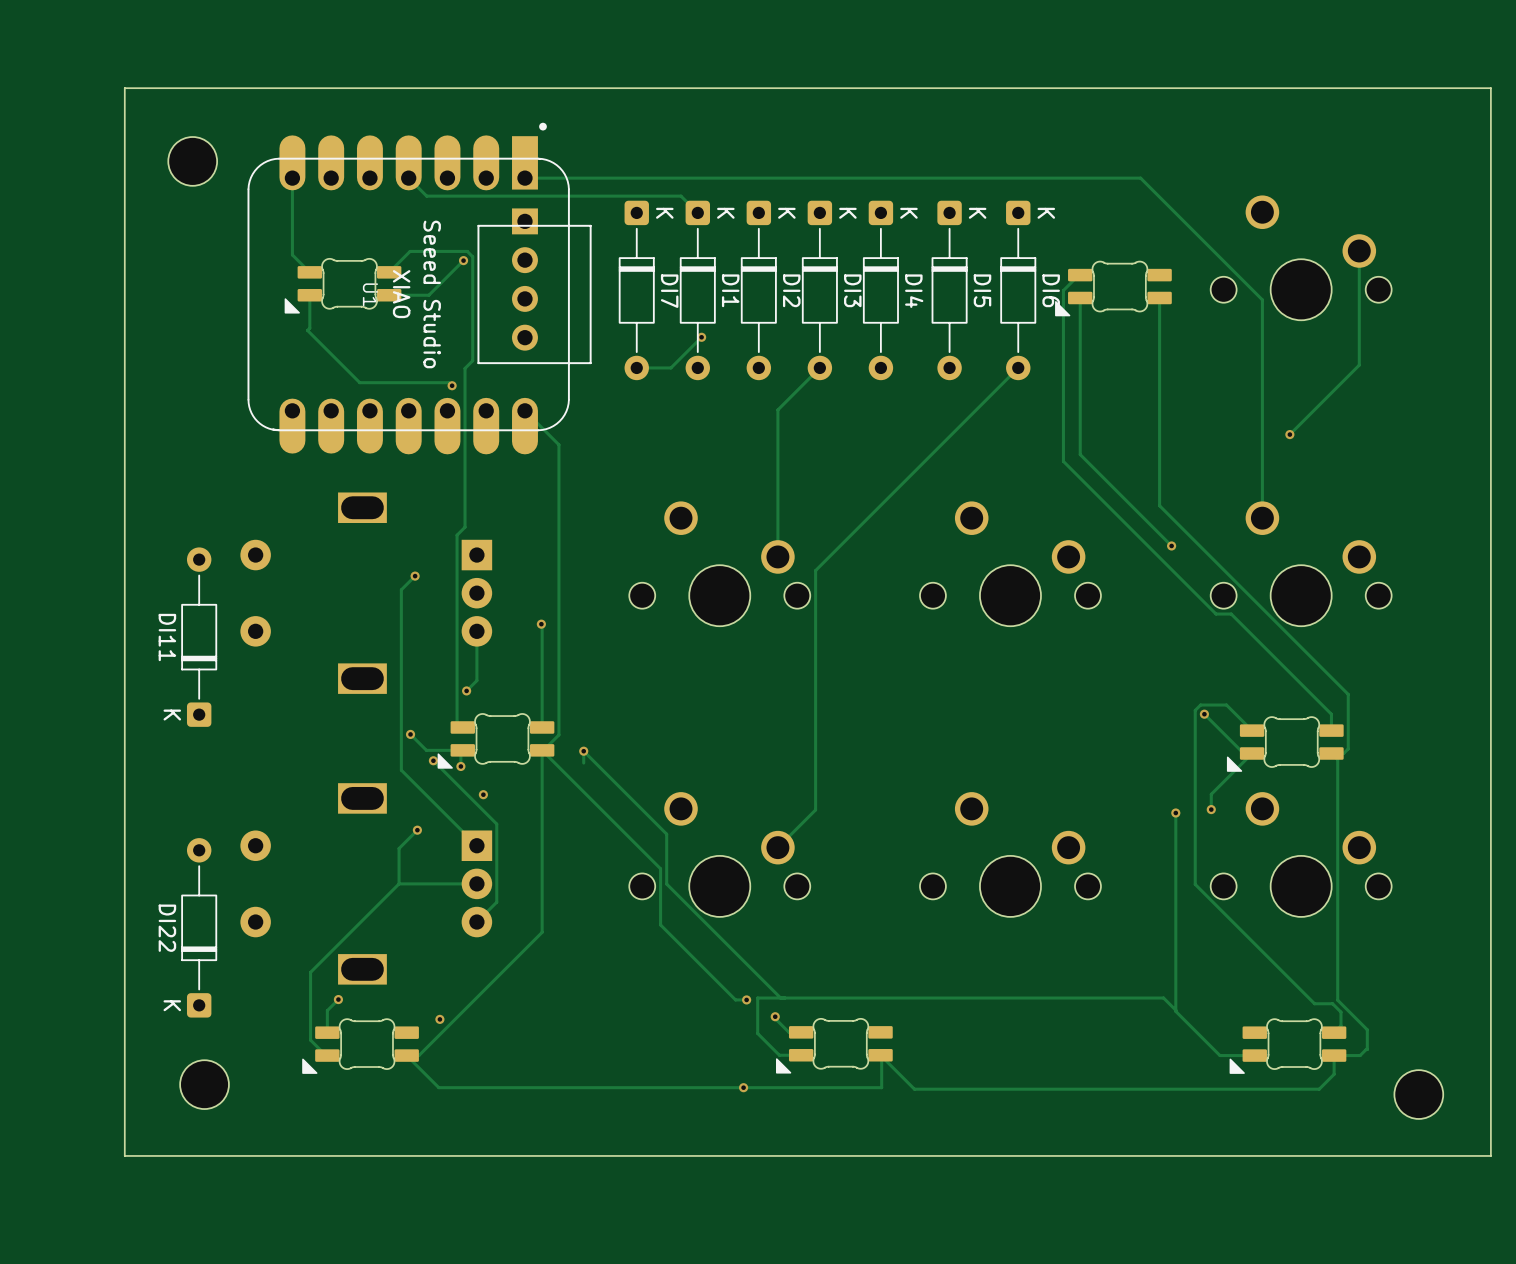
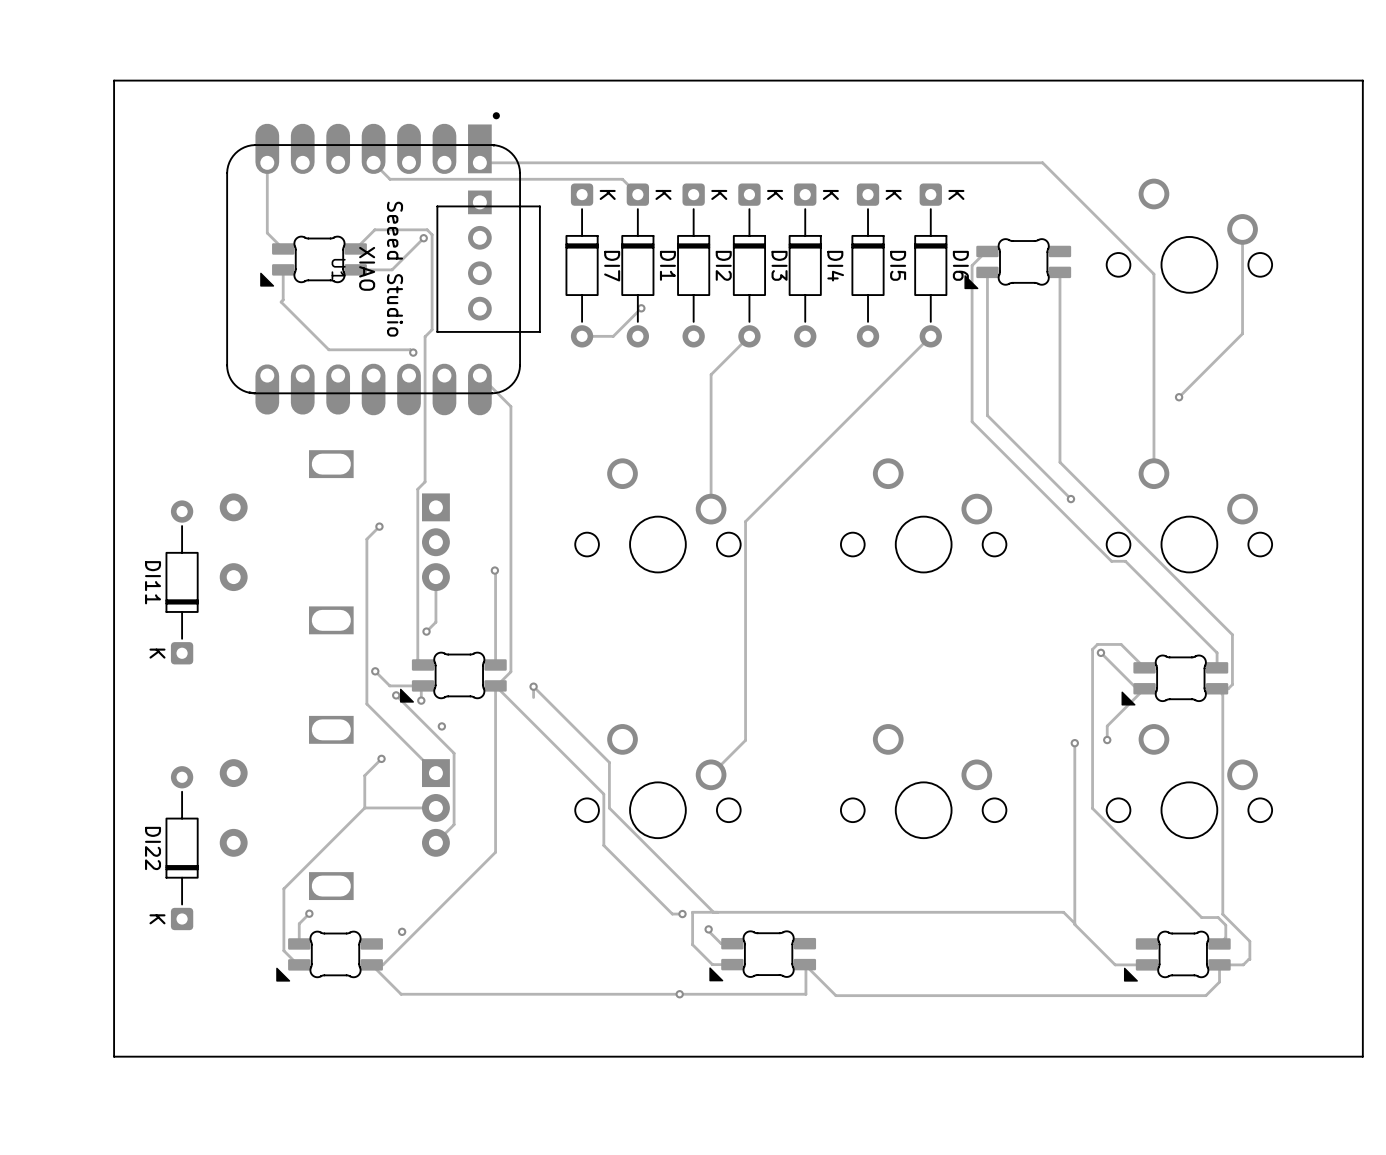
part: (192, 161) -> none
part: (204, 1084) -> none
part: (1418, 1094) -> none

